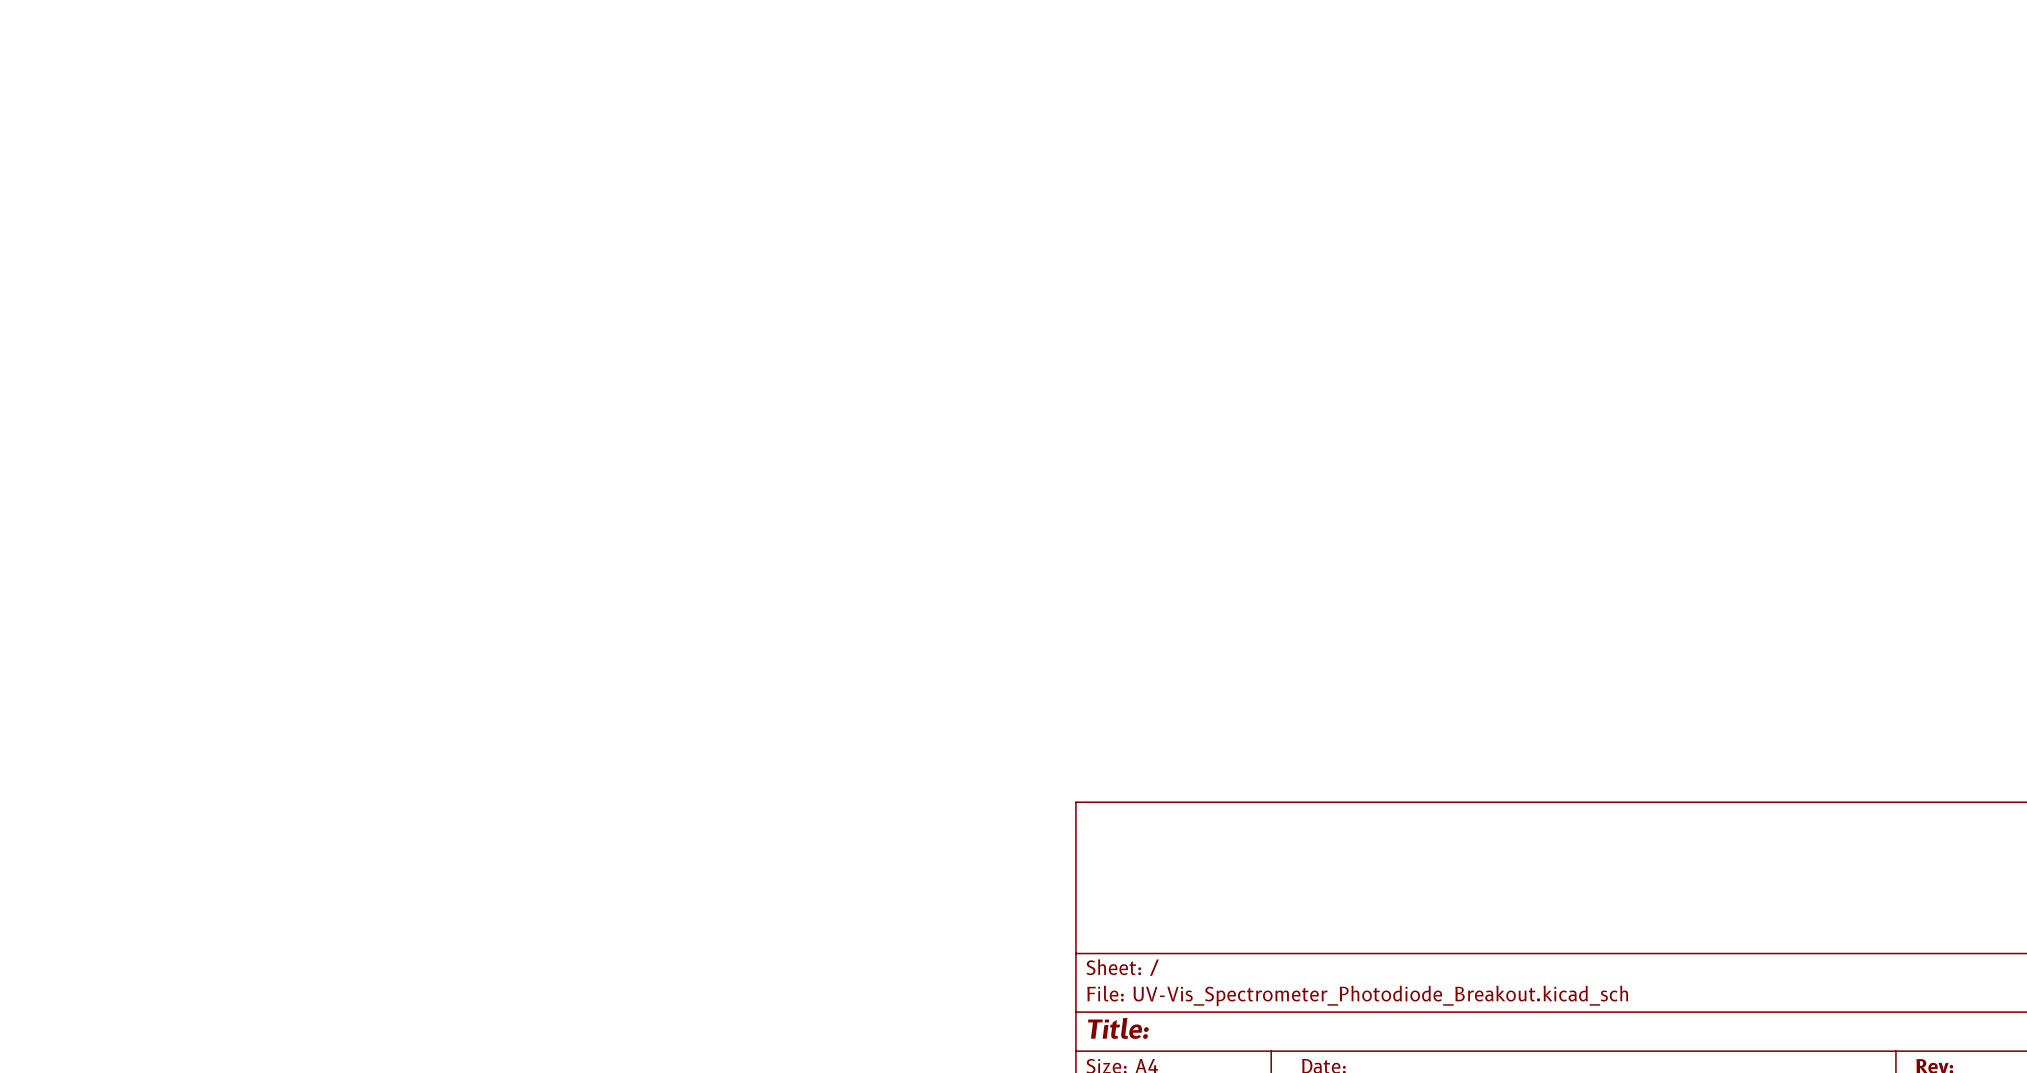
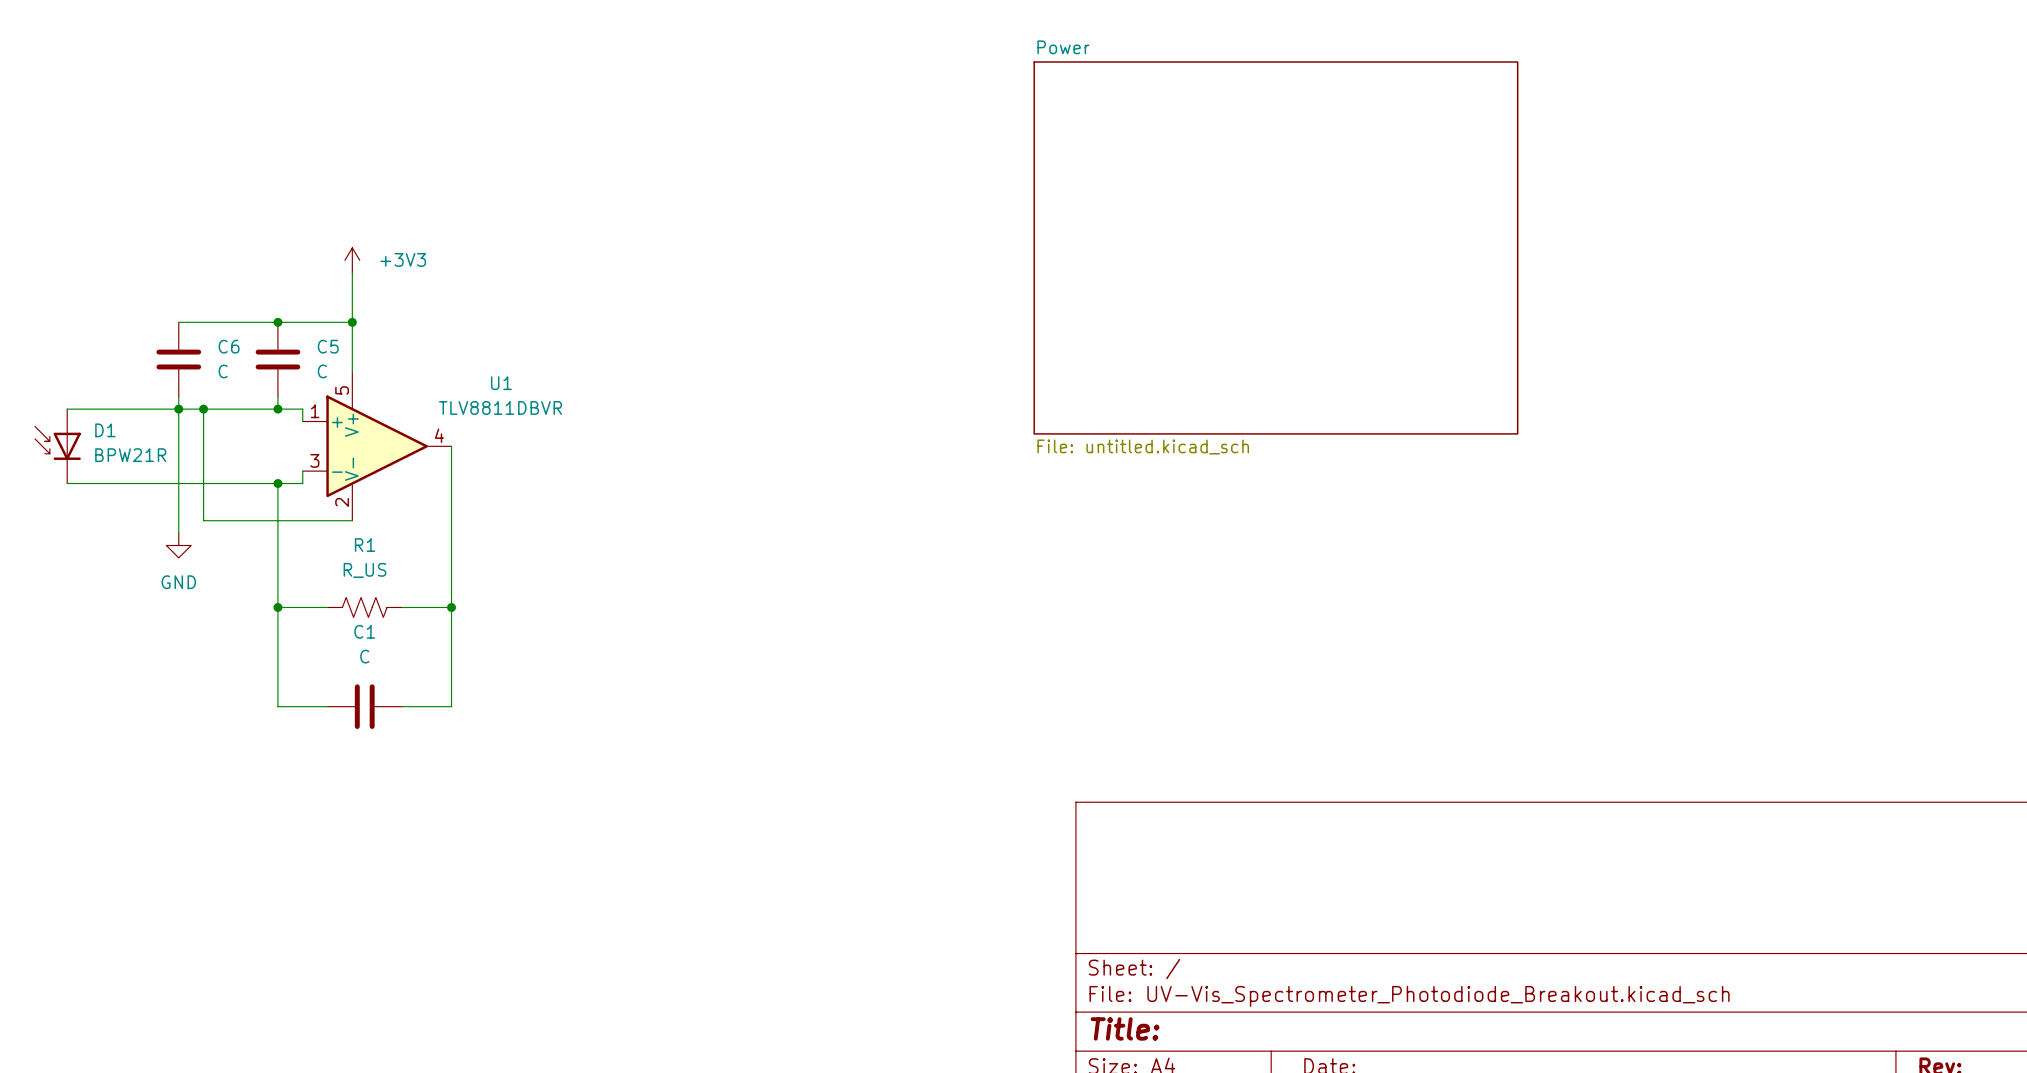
sheet Power: none -> File: untitled.kicad_sch (1275, 247)
power symbol: none -> +3V3 (352, 260)
wire: none -> (352, 272) (352, 371)
wire: none -> (178, 322) (352, 322)
junction: none -> (277, 322)
junction: none -> (352, 322)
C6: none -> C (178, 359)
C5: none -> C (277, 359)
wire: none -> (178, 396) (178, 533)
wire: none -> (277, 396) (277, 409)
wire: none -> (67, 409) (302, 409) (302, 421)
junction: none -> (178, 409)
wire: none -> (203, 409) (203, 520) (352, 520)
junction: none -> (203, 409)
junction: none -> (277, 409)
D1: none -> BPW21R (57, 446)
U1: none -> TLV8811DBVR (377, 446)
wire: none -> (451, 446) (451, 706) (401, 706)
wire: none -> (302, 471) (302, 483) (67, 483)
wire: none -> (277, 483) (277, 706) (327, 706)
junction: none -> (277, 483)
power symbol: none -> GND (178, 545)
wire: none -> (277, 607) (327, 607)
junction: none -> (277, 607)
R1: none -> R_US (364, 607)
wire: none -> (401, 607) (451, 607)
junction: none -> (451, 607)
C1: none -> C (364, 706)

